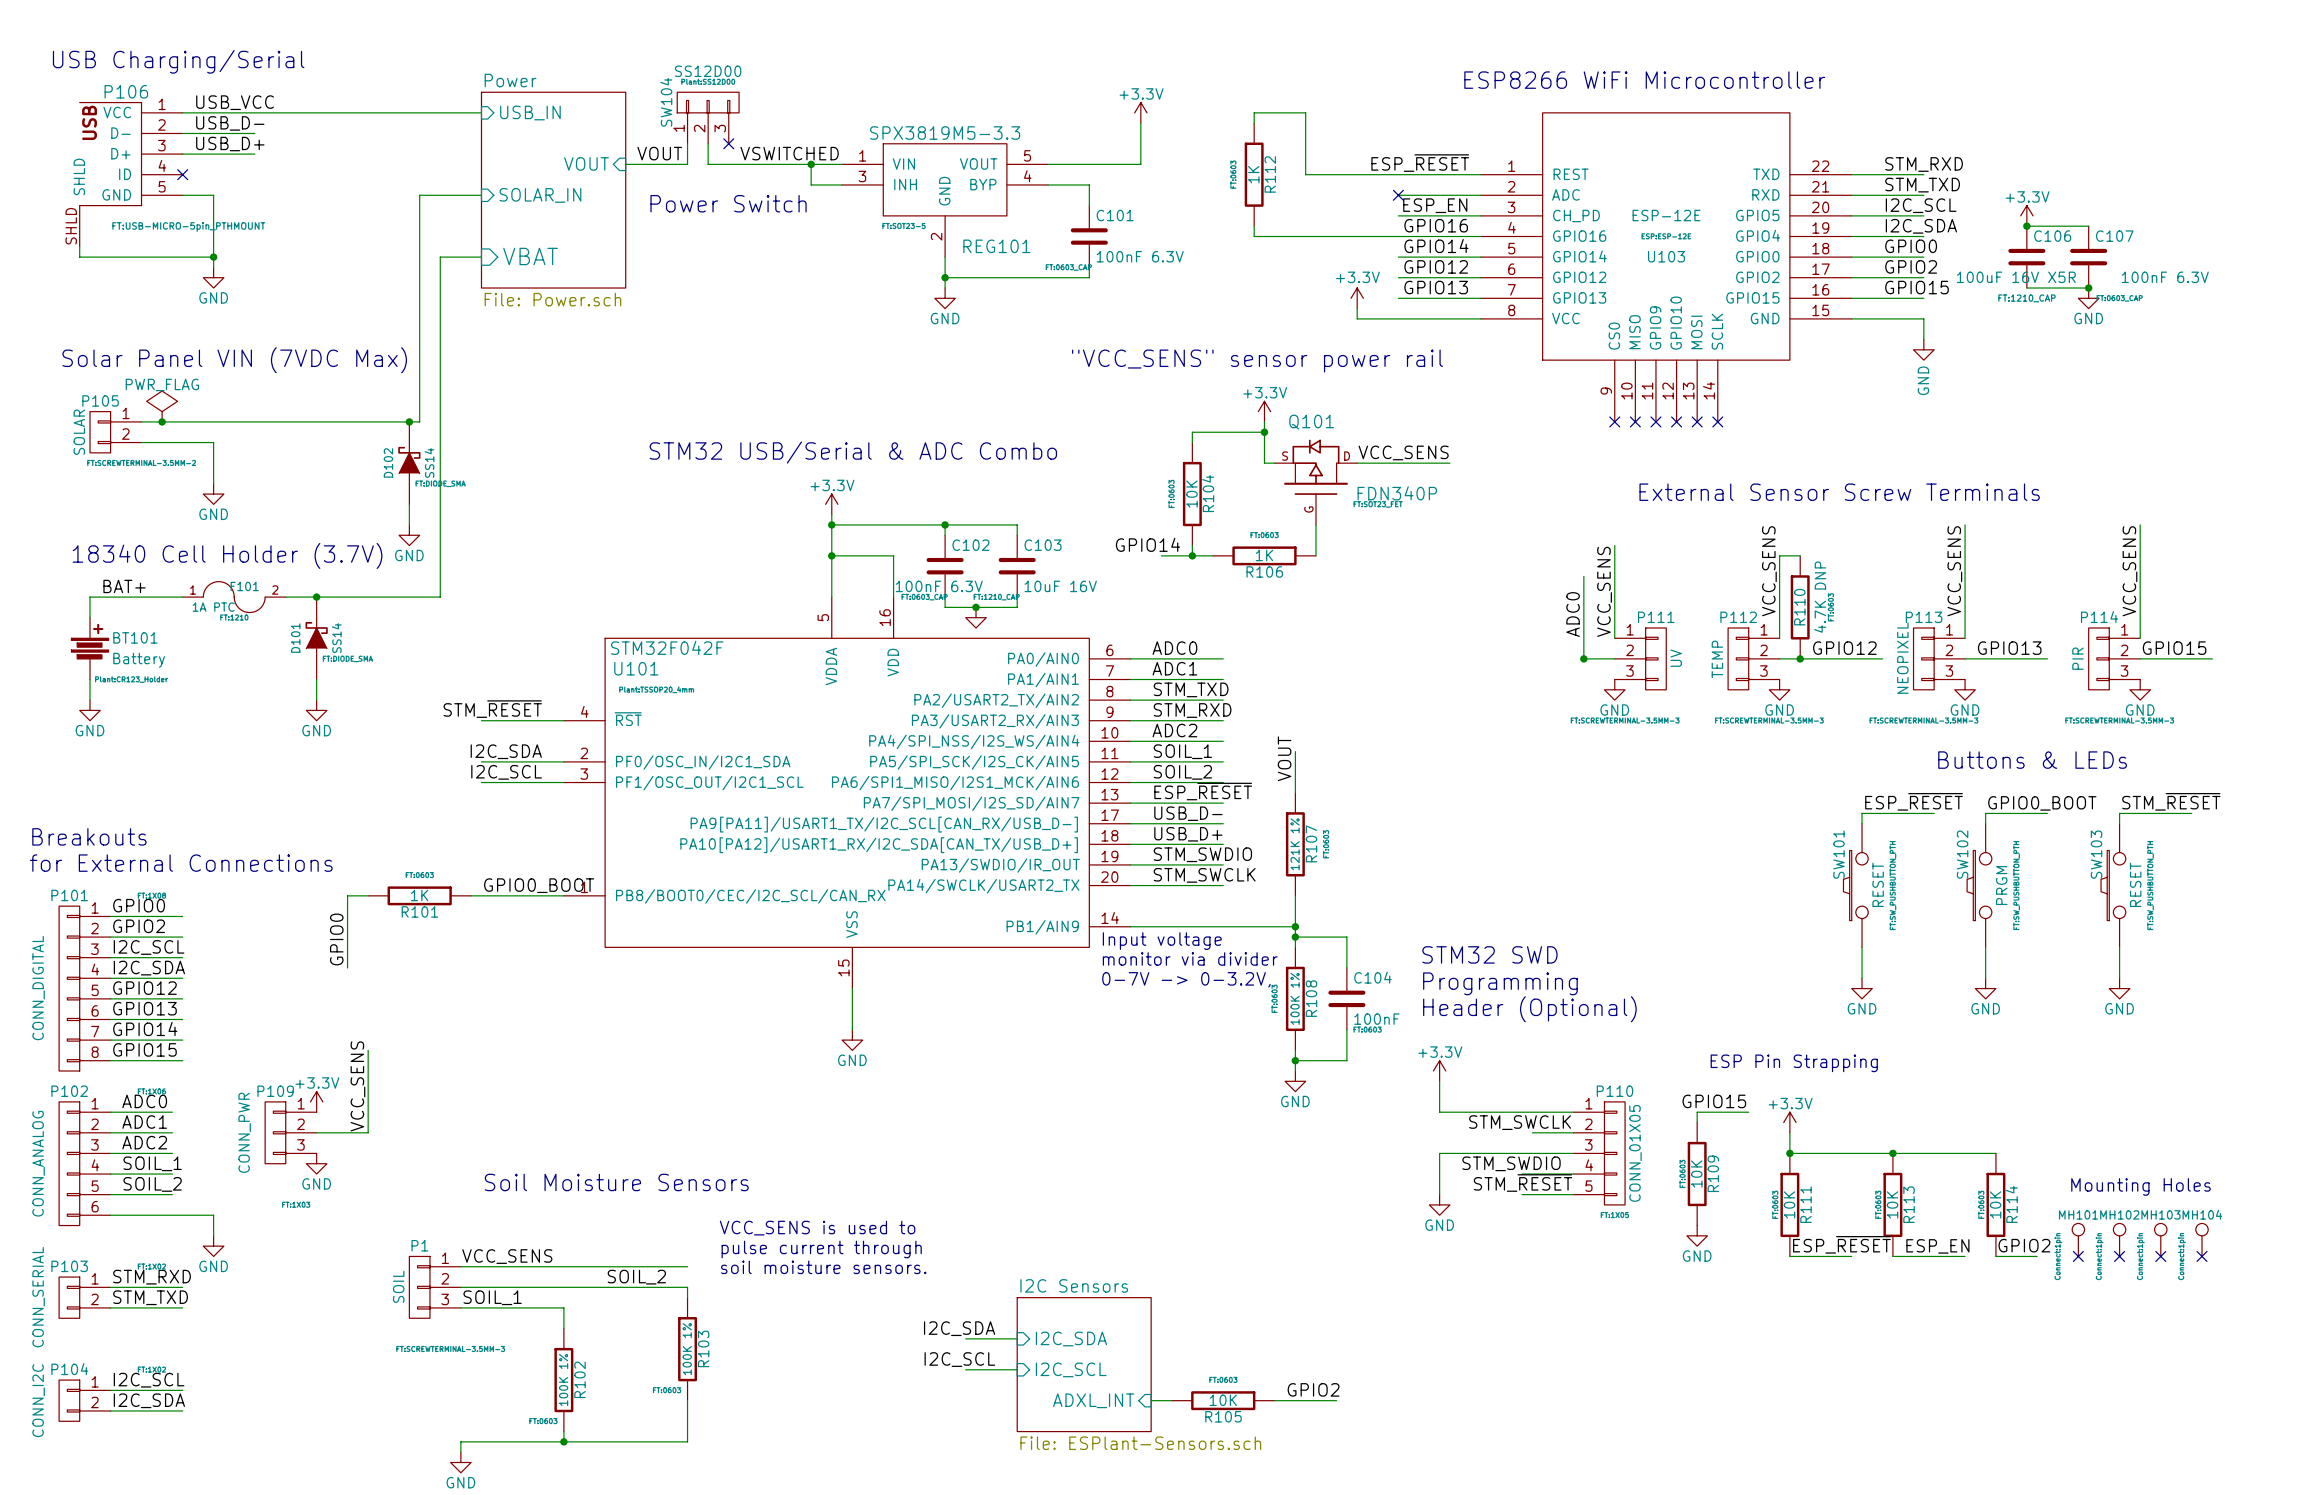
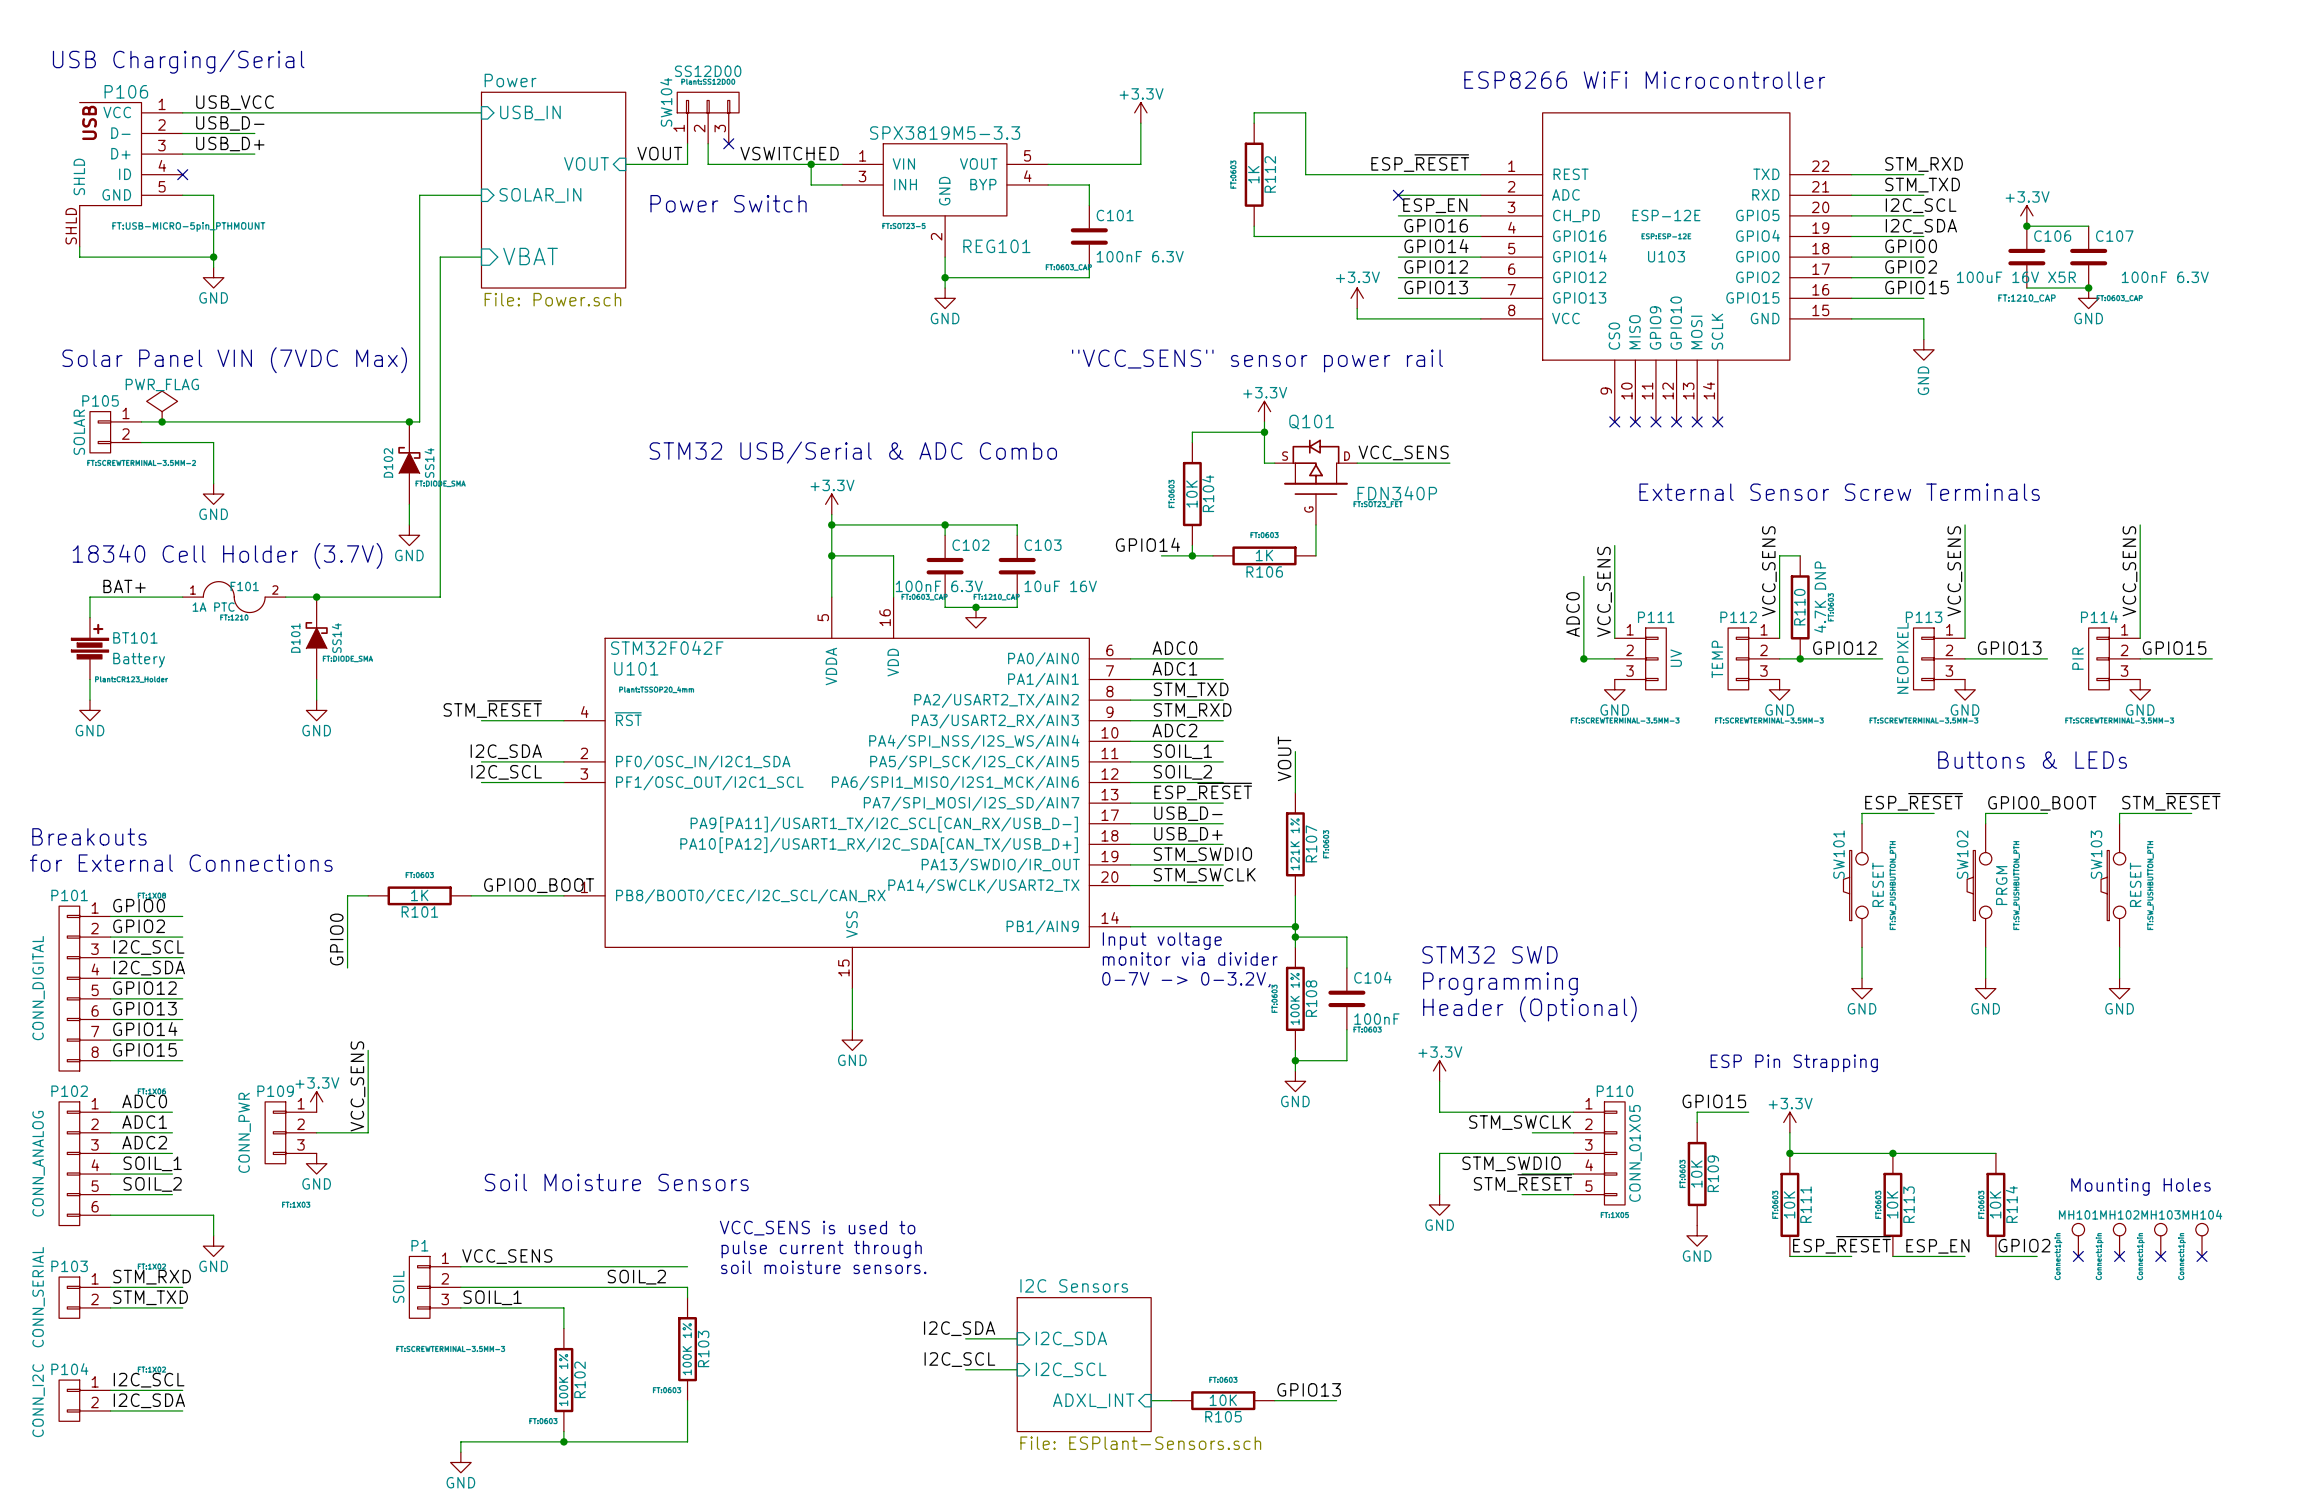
label: GPIO2 (1313, 1389) -> GPIO13 (1309, 1389)

